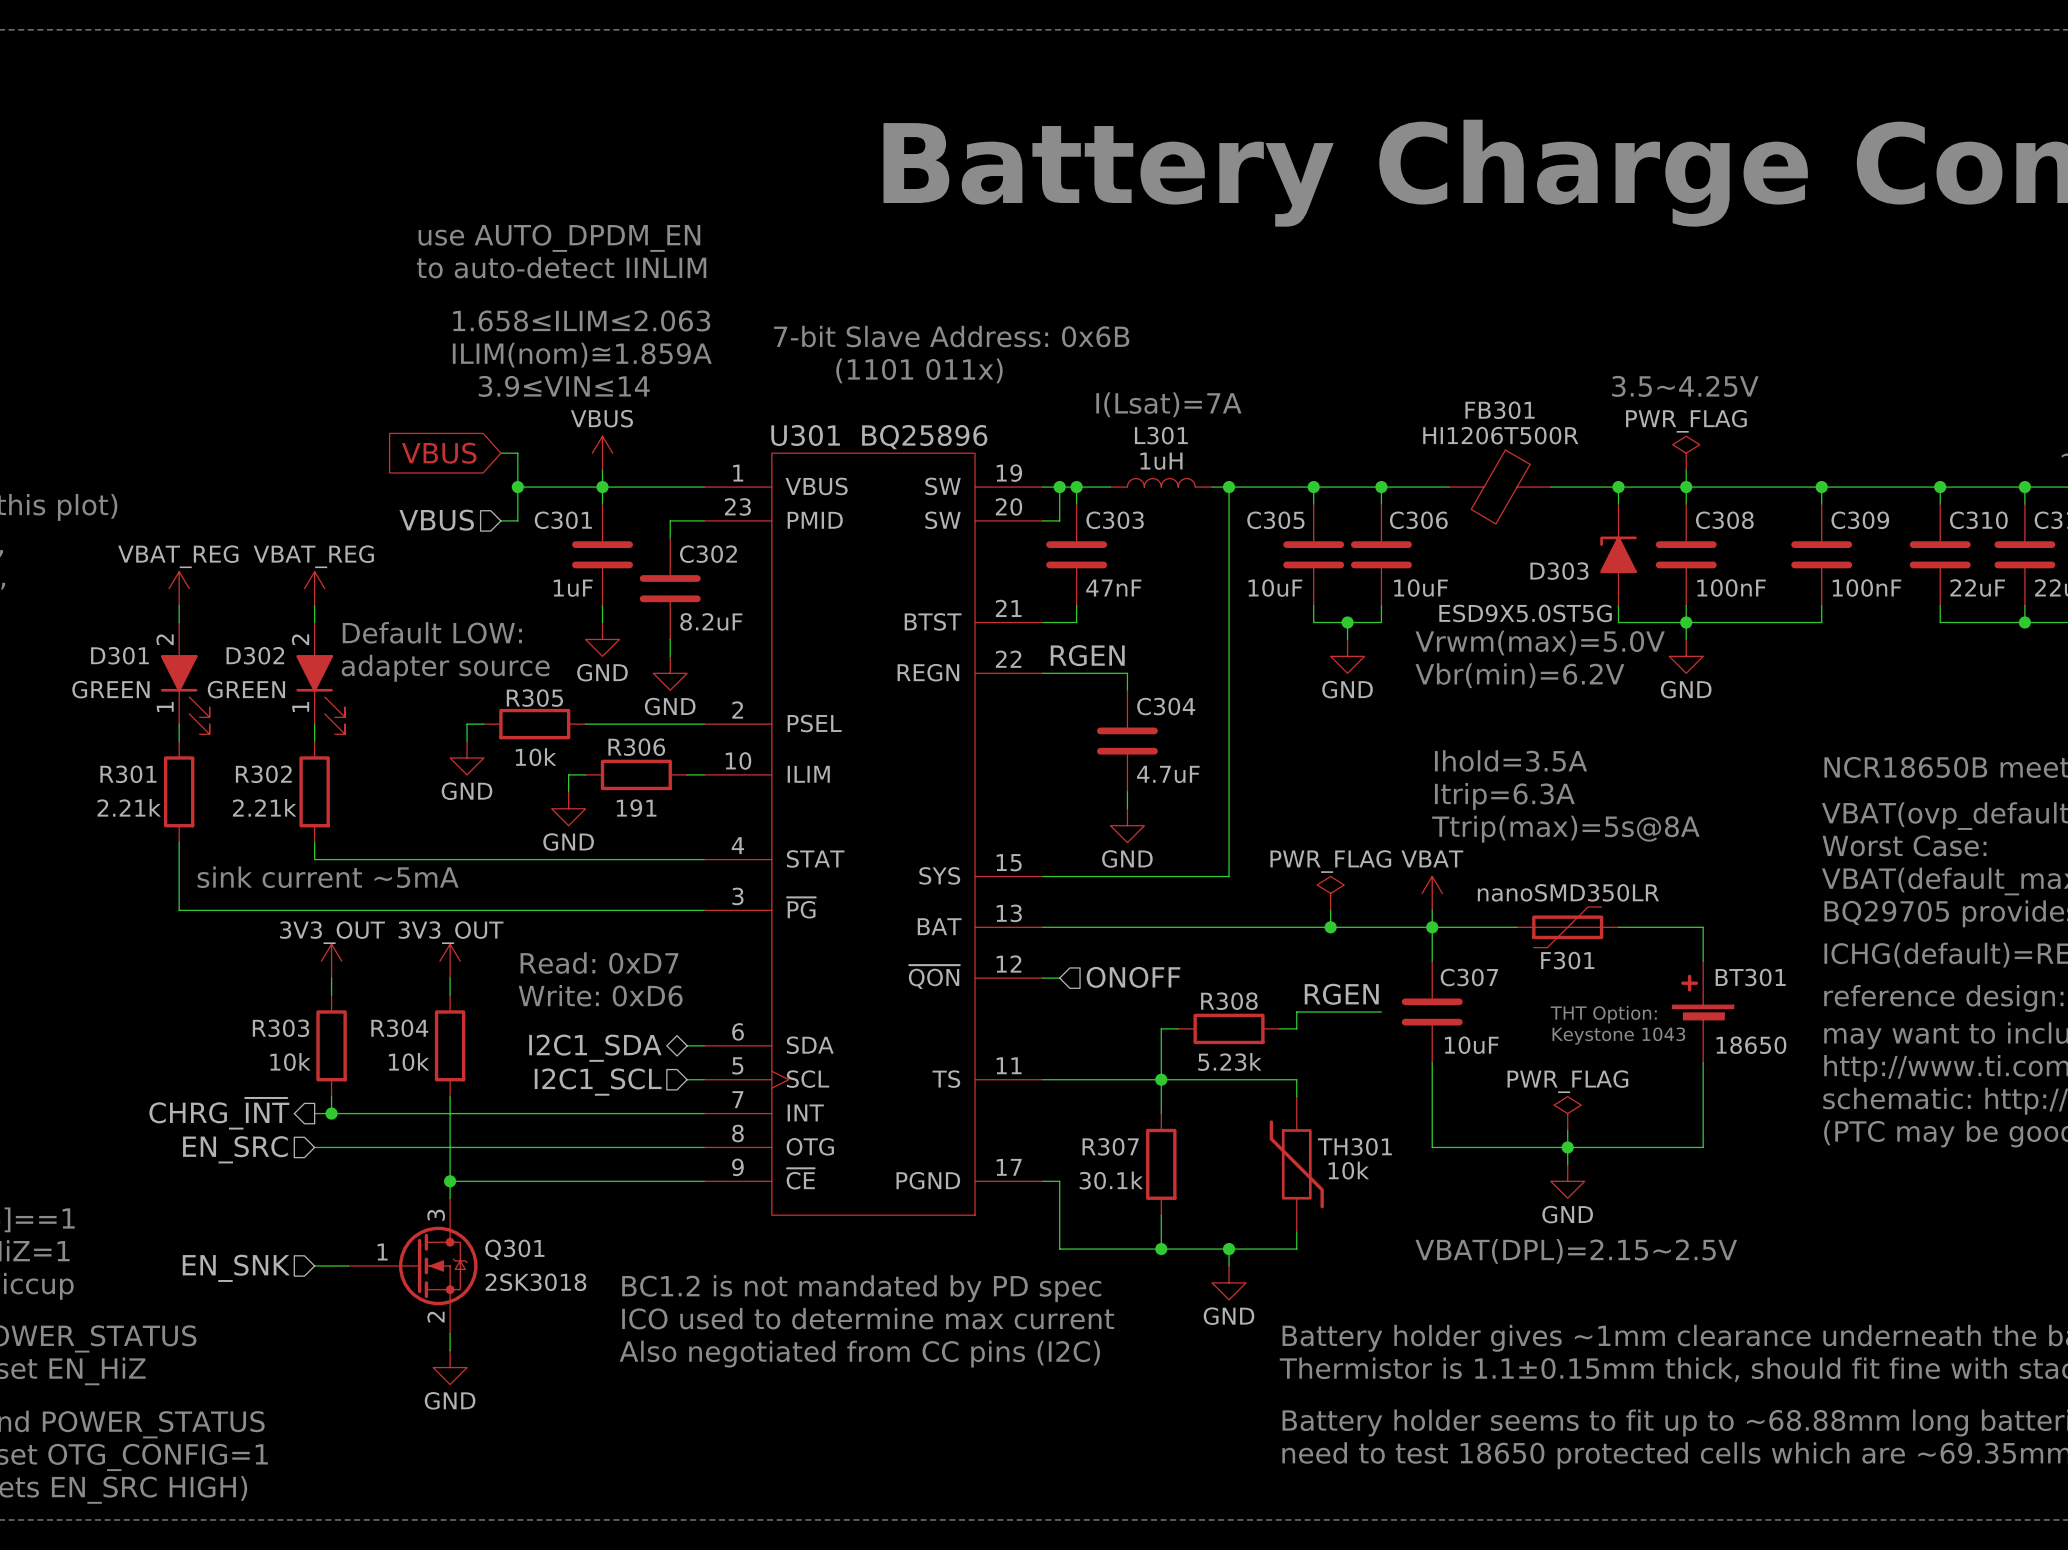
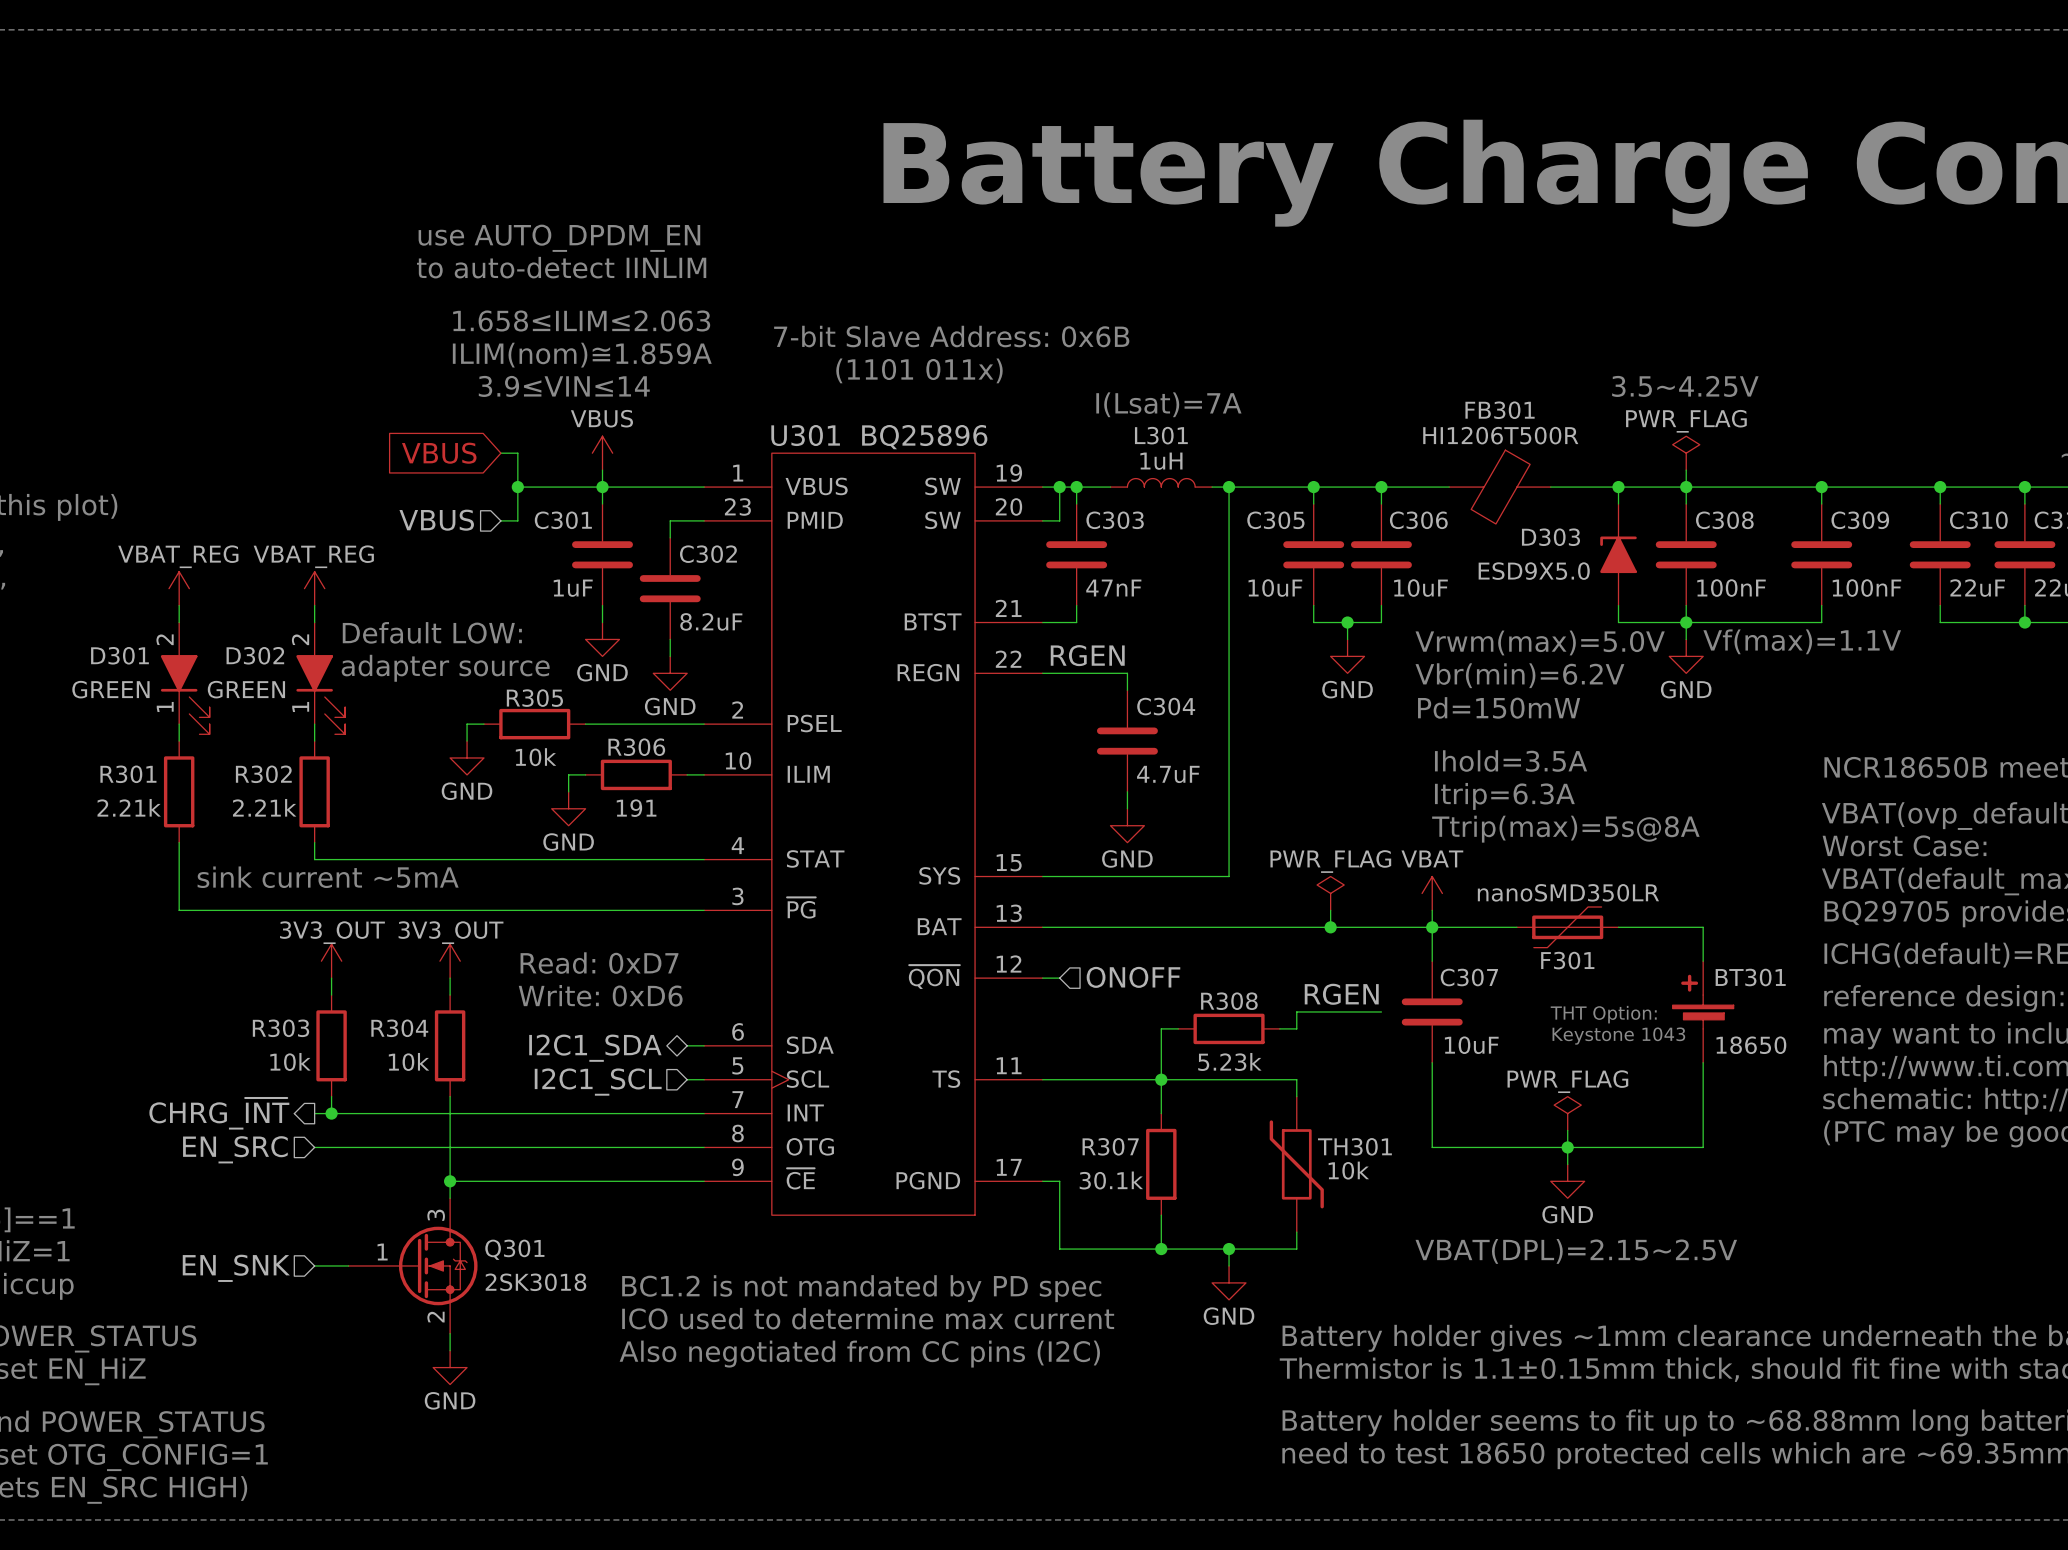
D303 name position: D303 (1559, 571) -> D303 (1550, 537)
D303 value: ESD9X5.0ST5G (1525, 613) -> ESD9X5.0 (1534, 571)
text: none -> Vf(max)=1.1V (1802, 641)
text: none -> Pd=150mW (1499, 707)

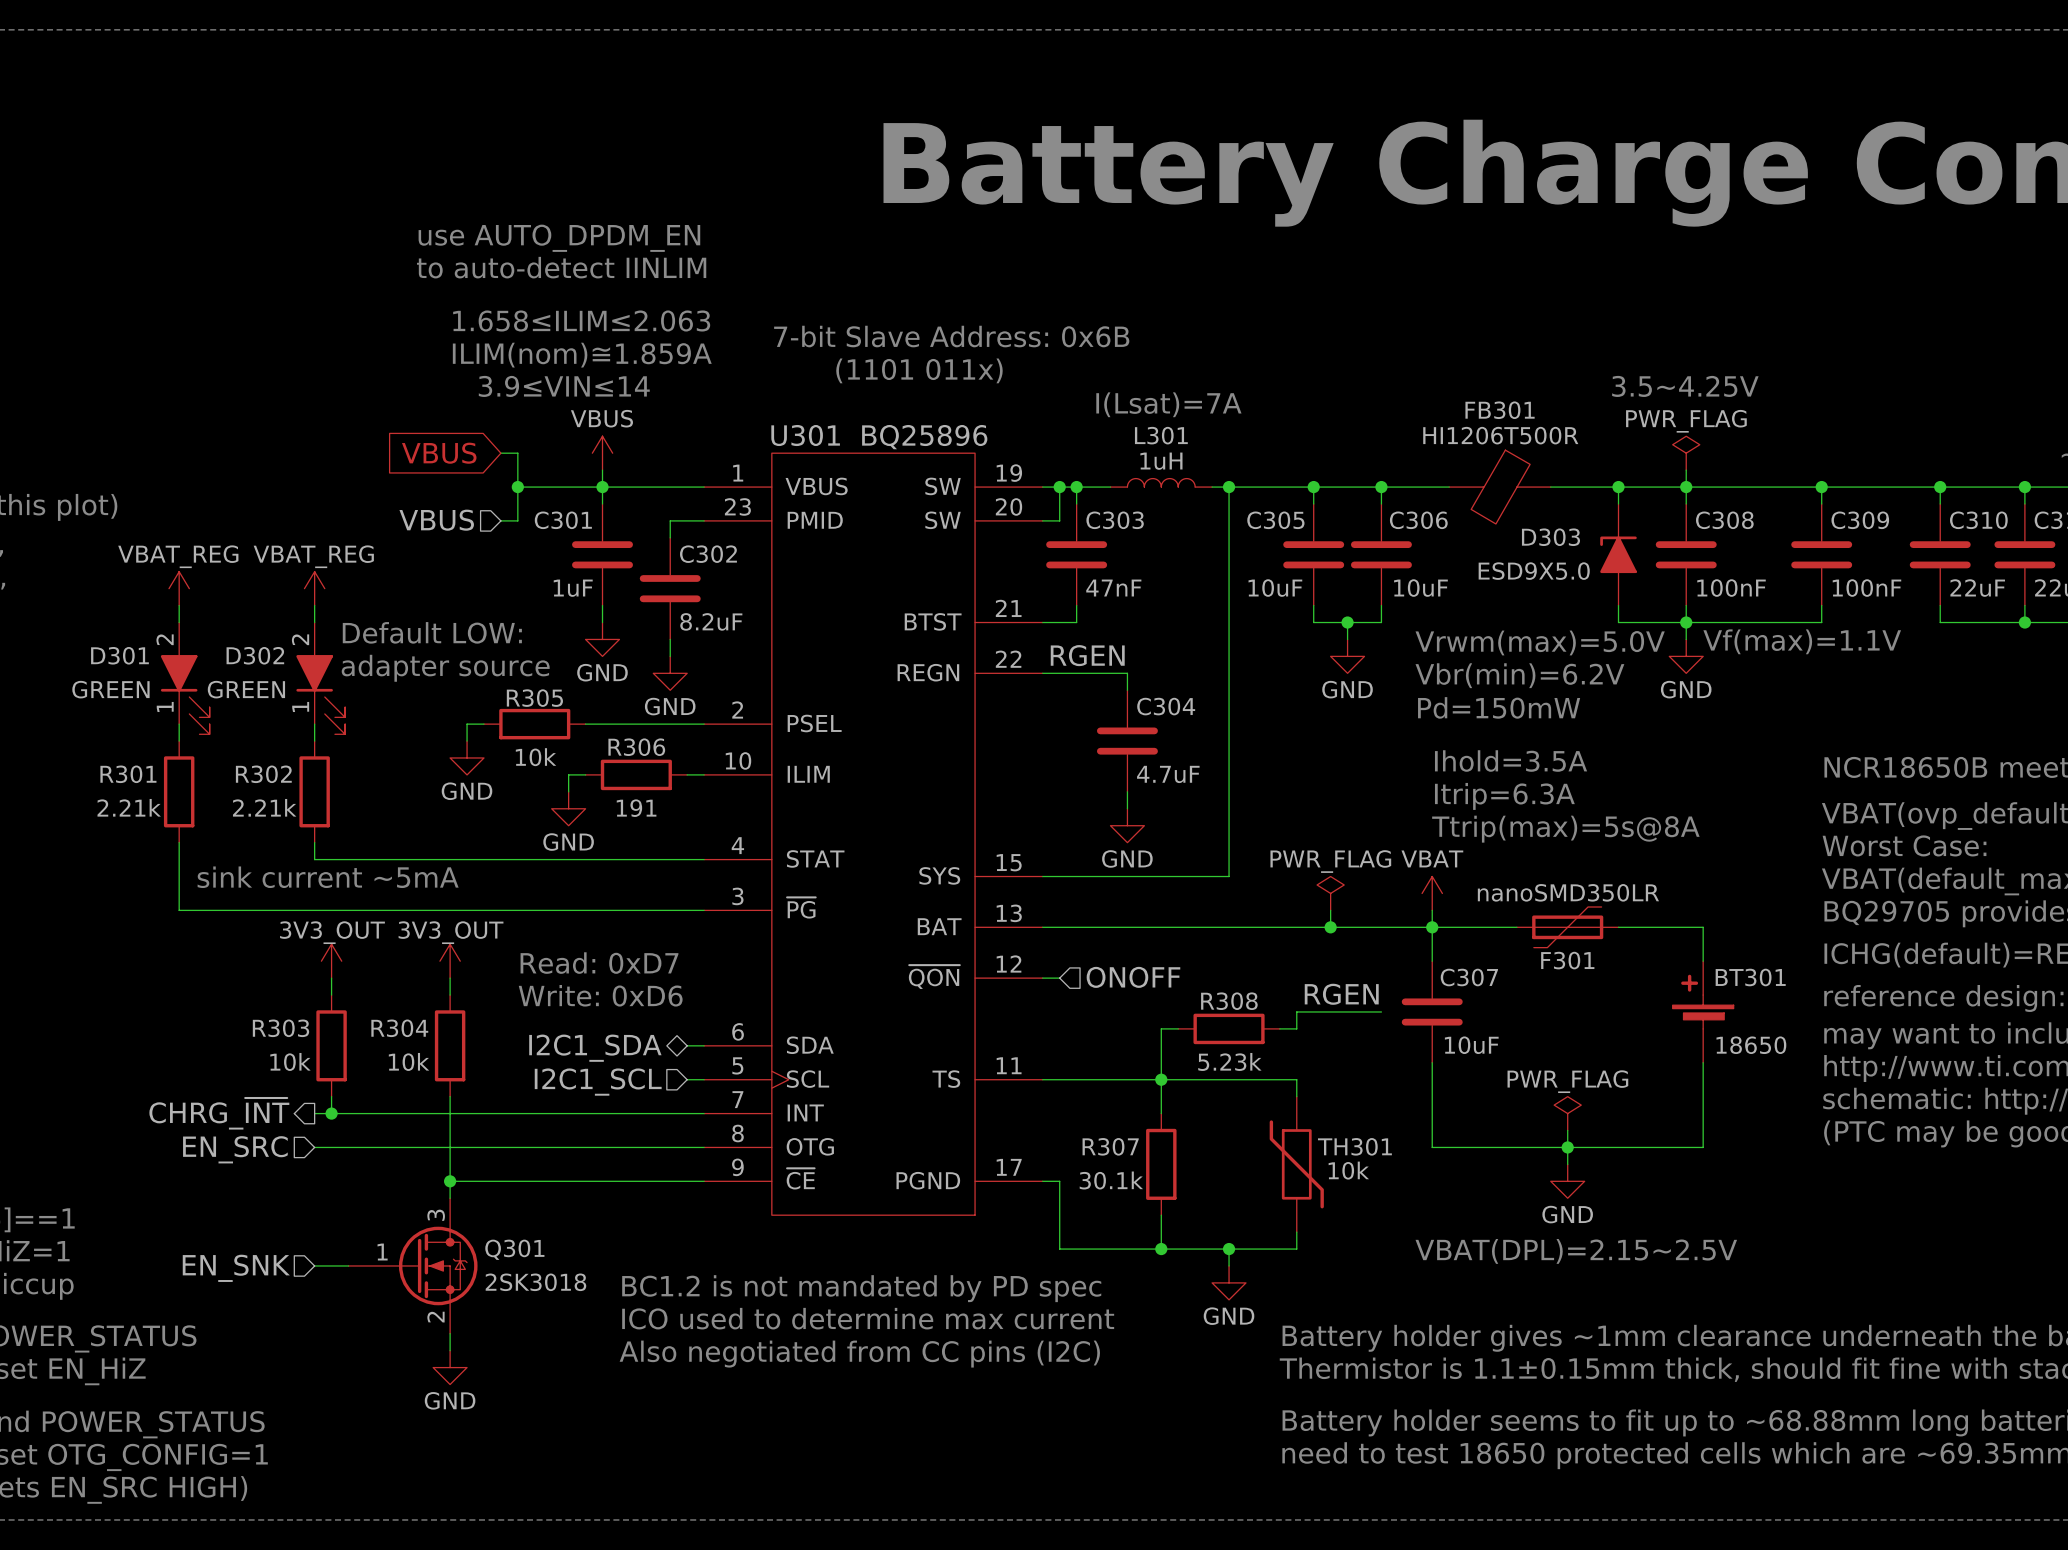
text: THT Option: (1603, 1014) -> none
text: Keystone 1043 (1618, 1036) -> none

